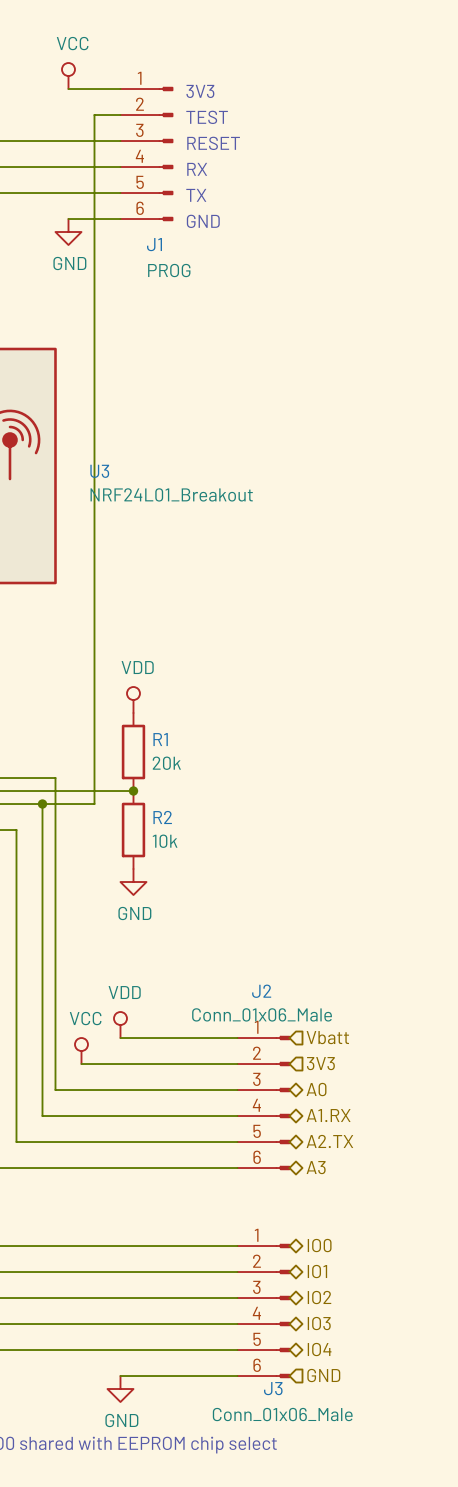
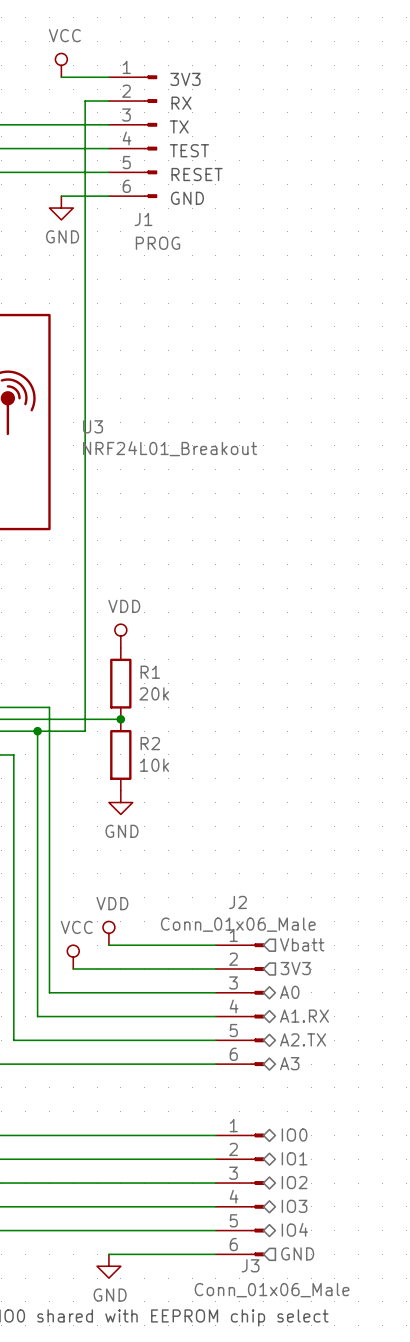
text: TEST (207, 117) -> RX (181, 103)
text: RESET (213, 143) -> TX (179, 126)
text: RX (197, 169) -> TEST (189, 150)
text: TX (196, 195) -> RESET (197, 174)

